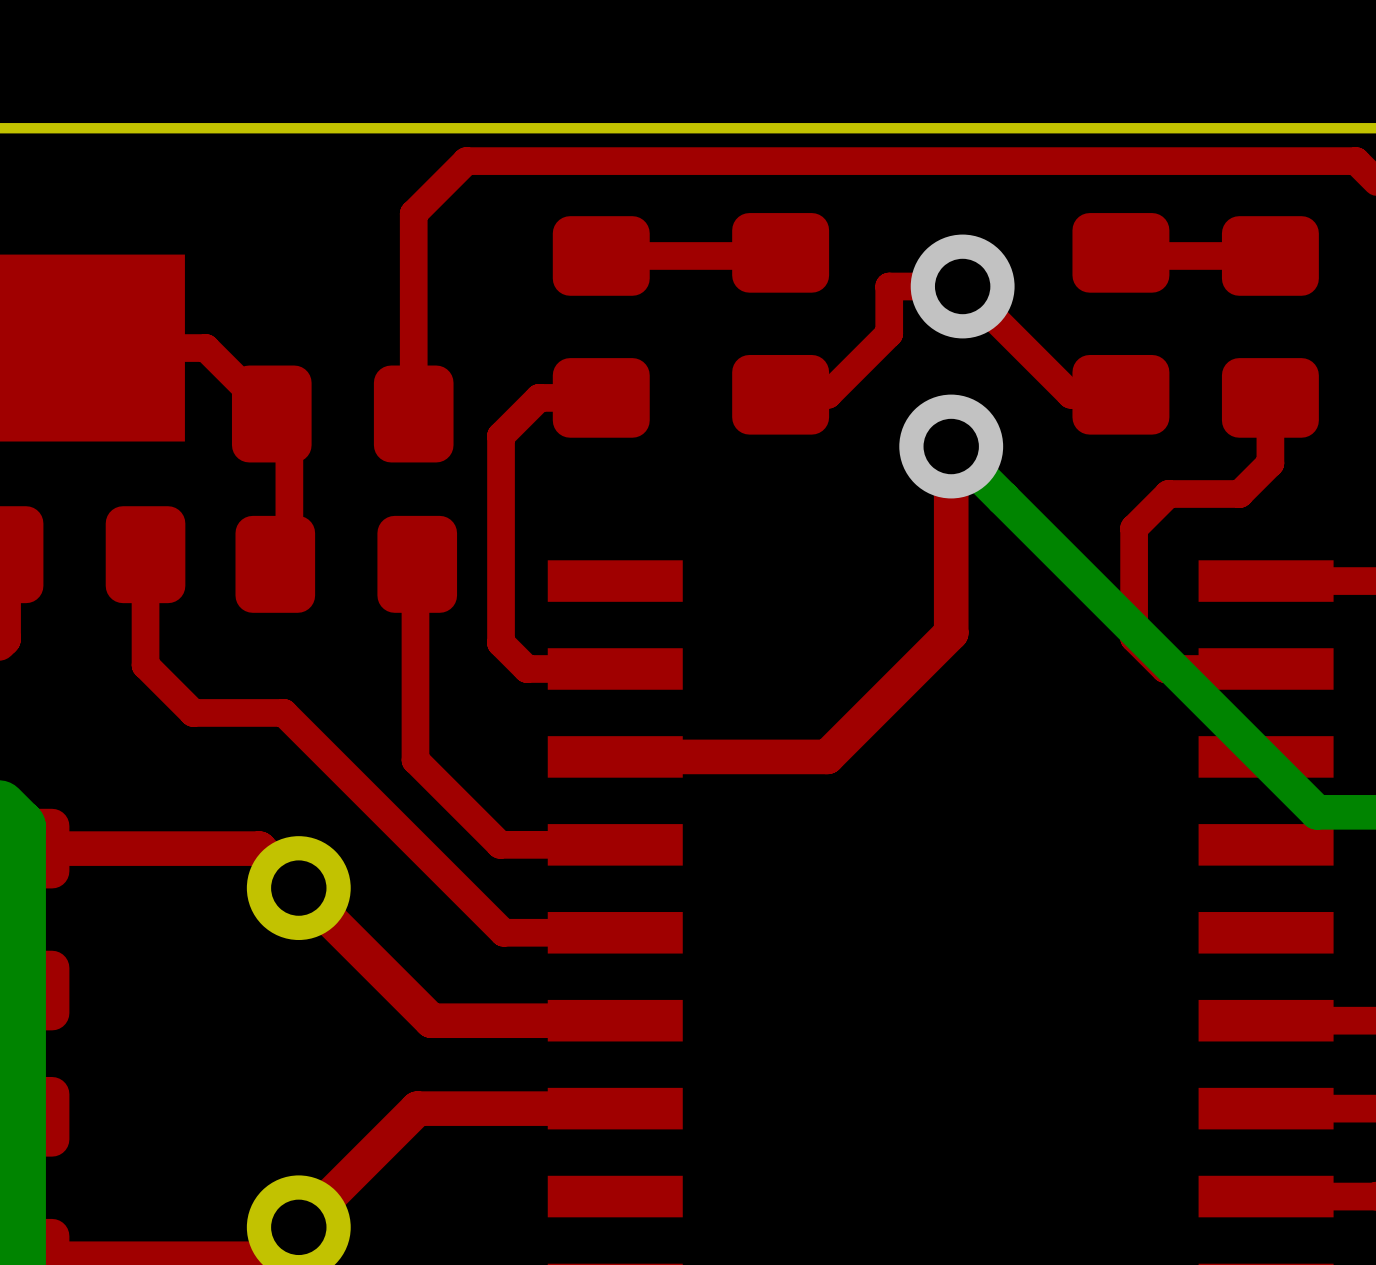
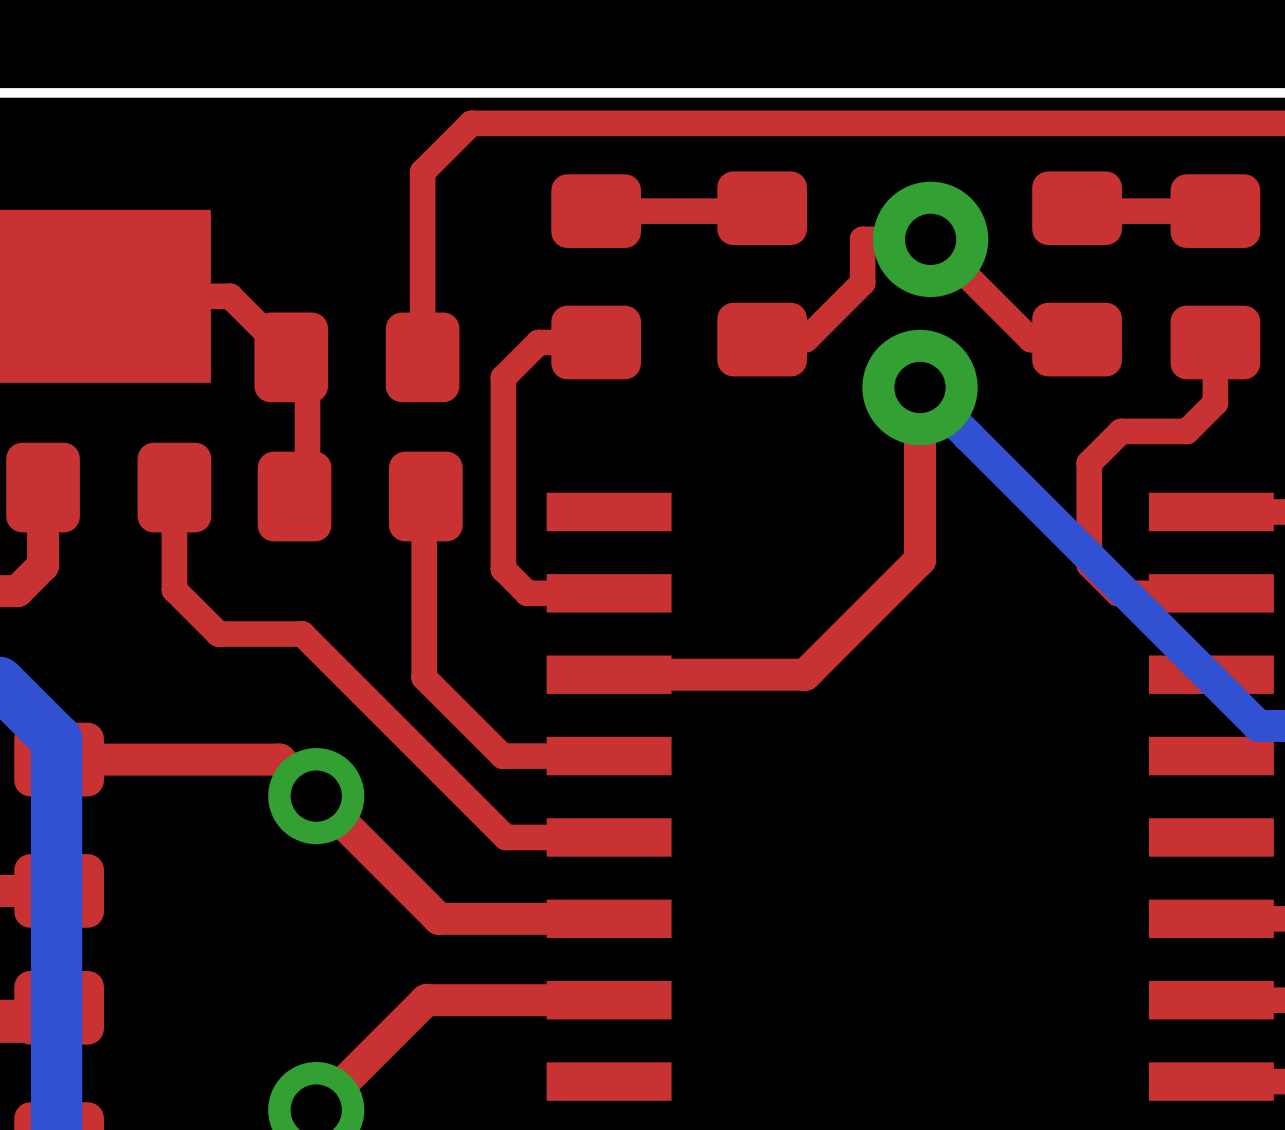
via size: [910, 234, 1015, 339] -> [872, 181, 989, 298]
via size: [899, 394, 1004, 499] -> [862, 329, 978, 446]

